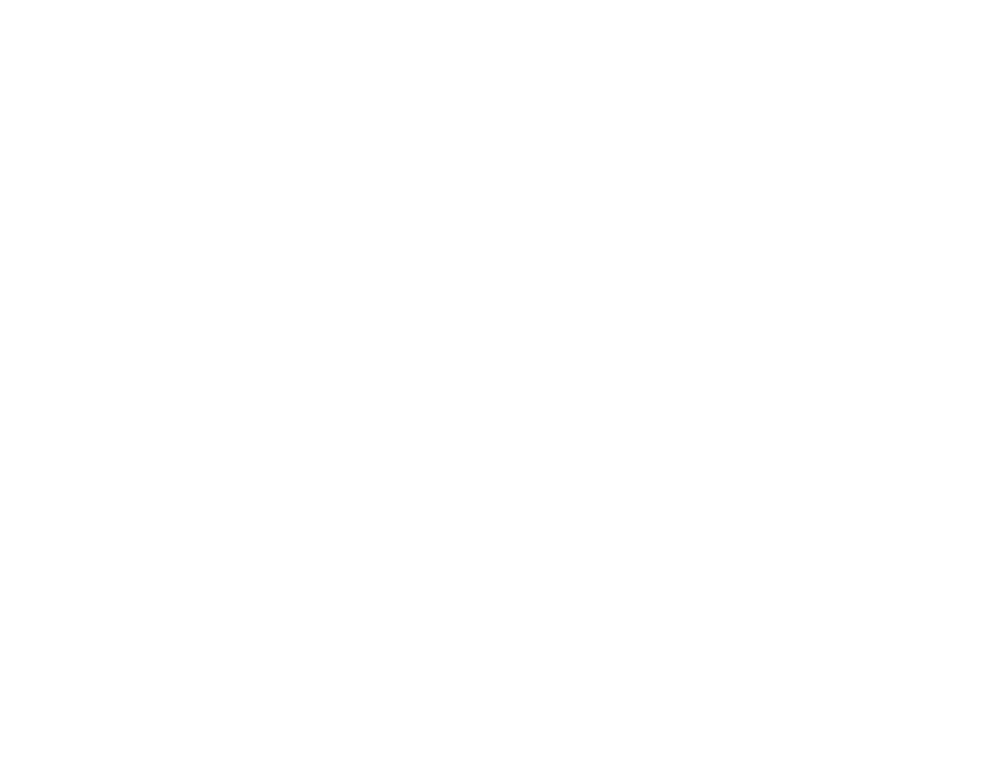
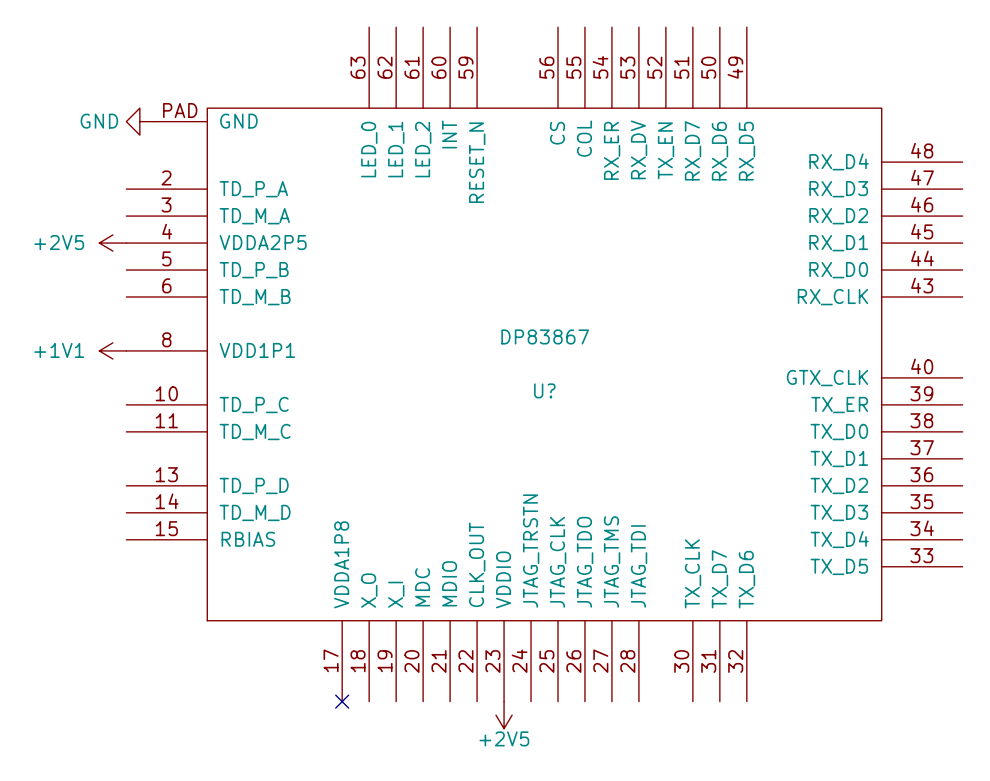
power symbol: none -> GND (139, 121)
power symbol: none -> +2V5 (112, 243)
power symbol: none -> +1V1 (112, 350)
U?: none -> DP83867 (544, 364)
no-connect mark: none -> (342, 701)
power symbol: none -> +2V5 (504, 715)

